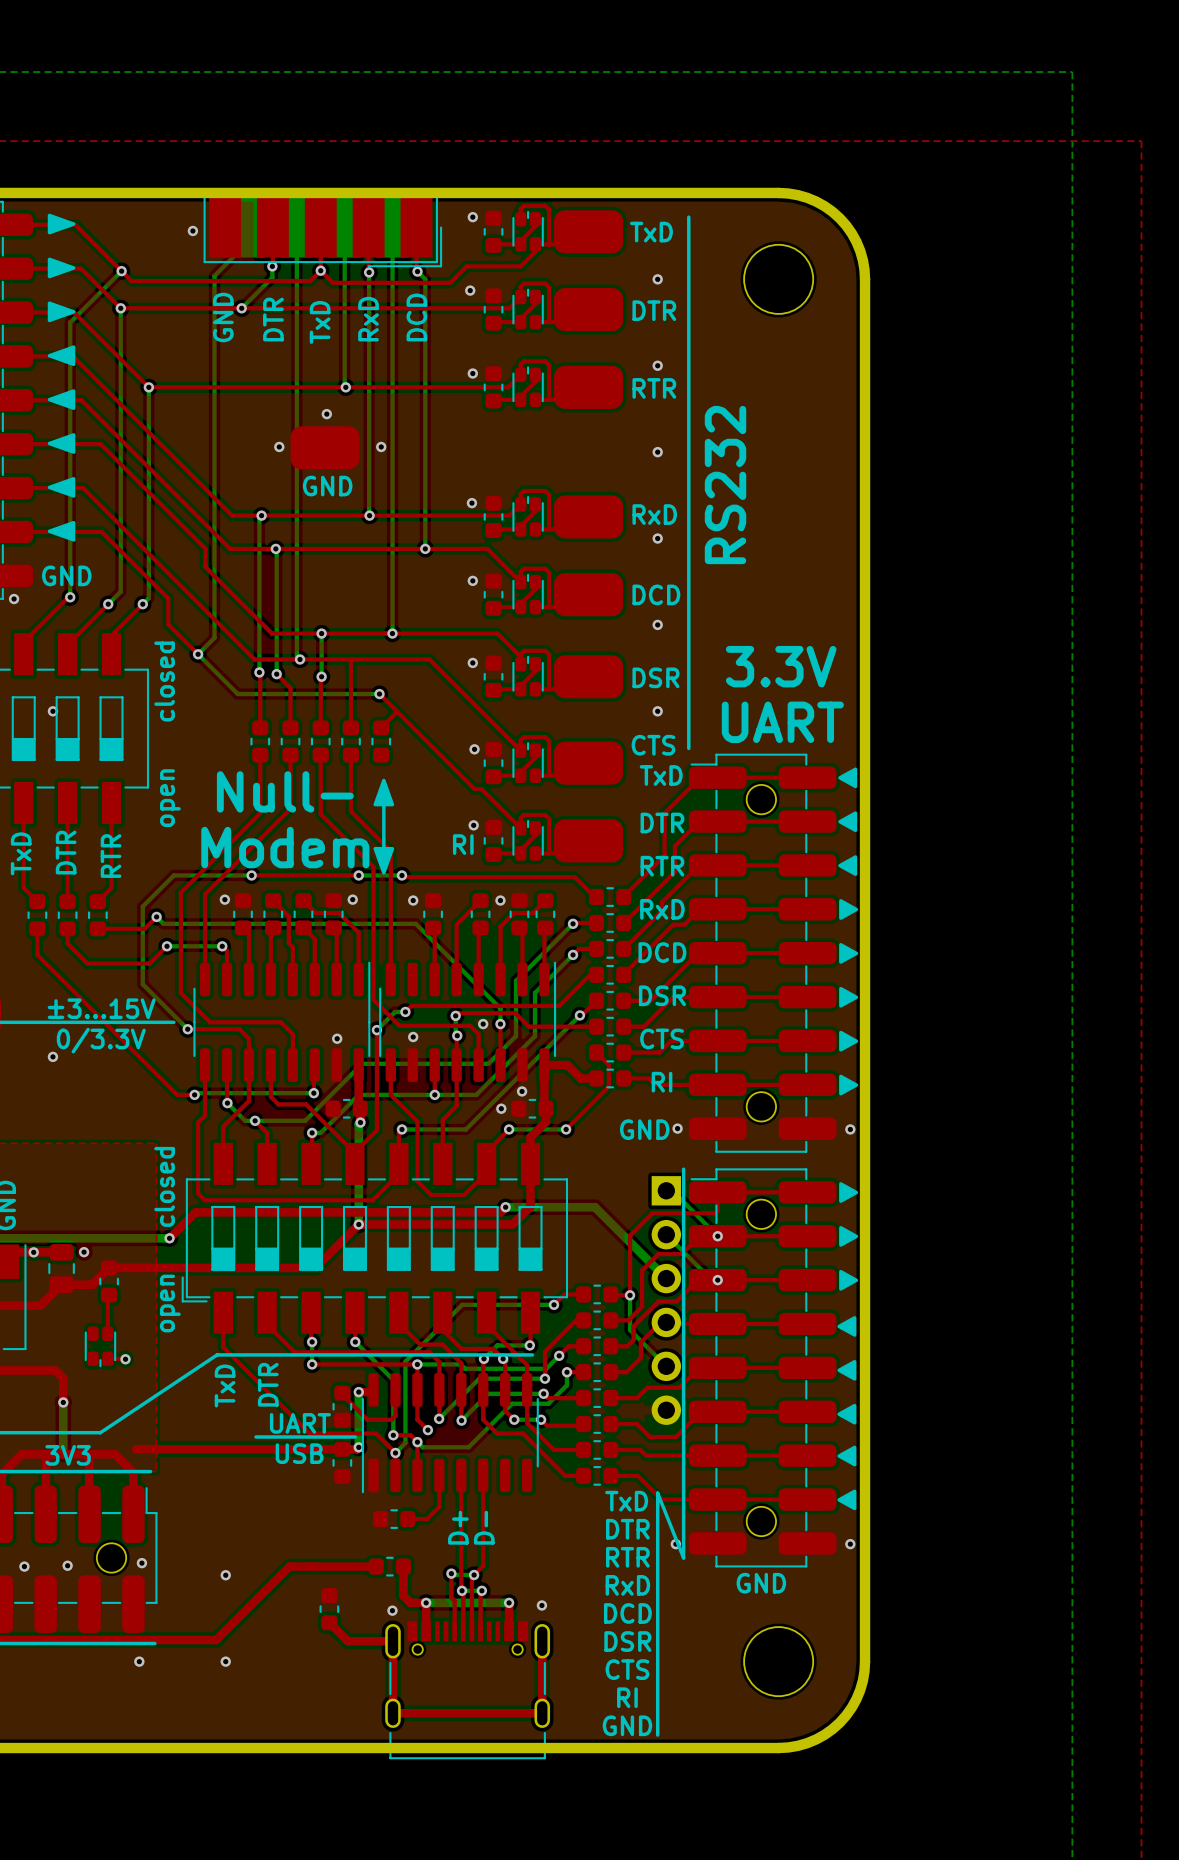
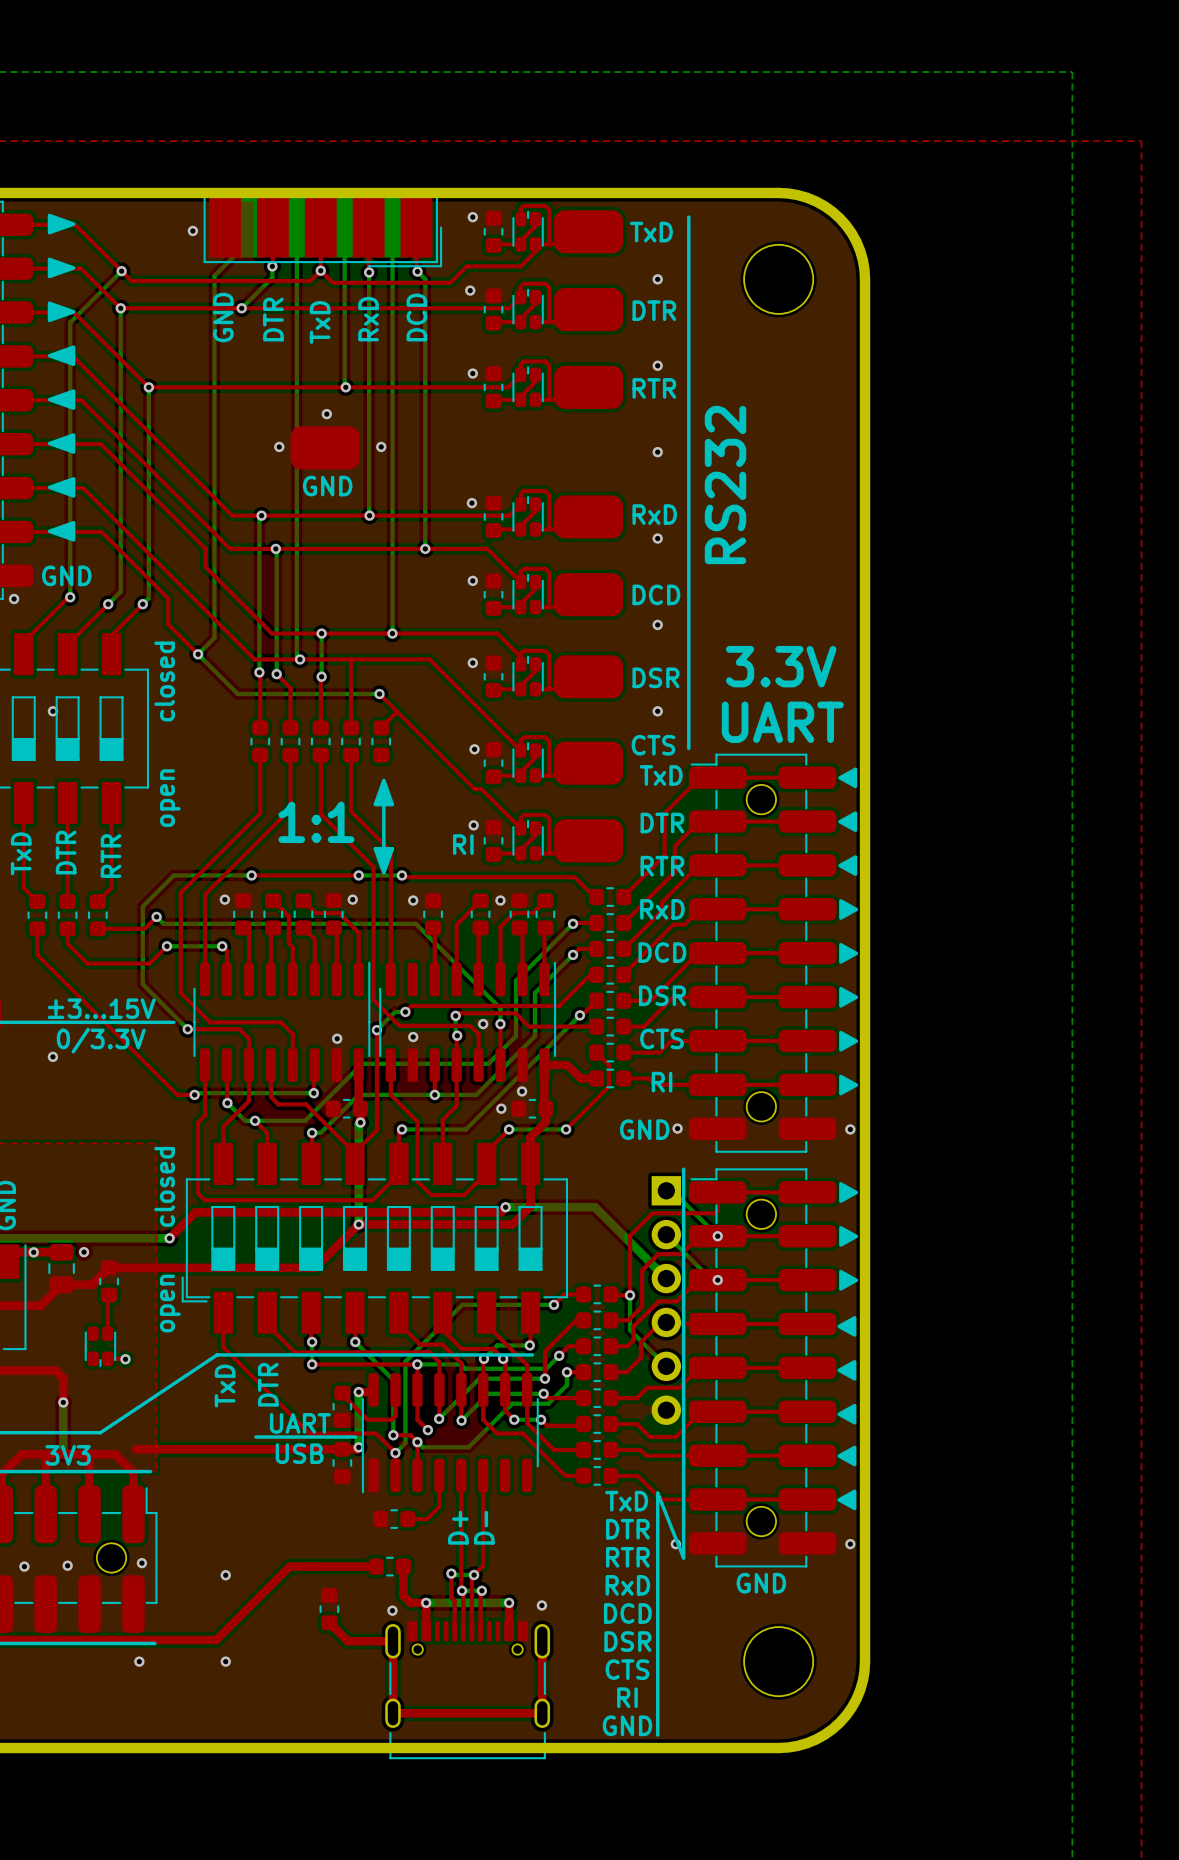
text: Null- (285, 791) -> none
text: none -> 1:1 (316, 822)
text: Modem (285, 847) -> none

